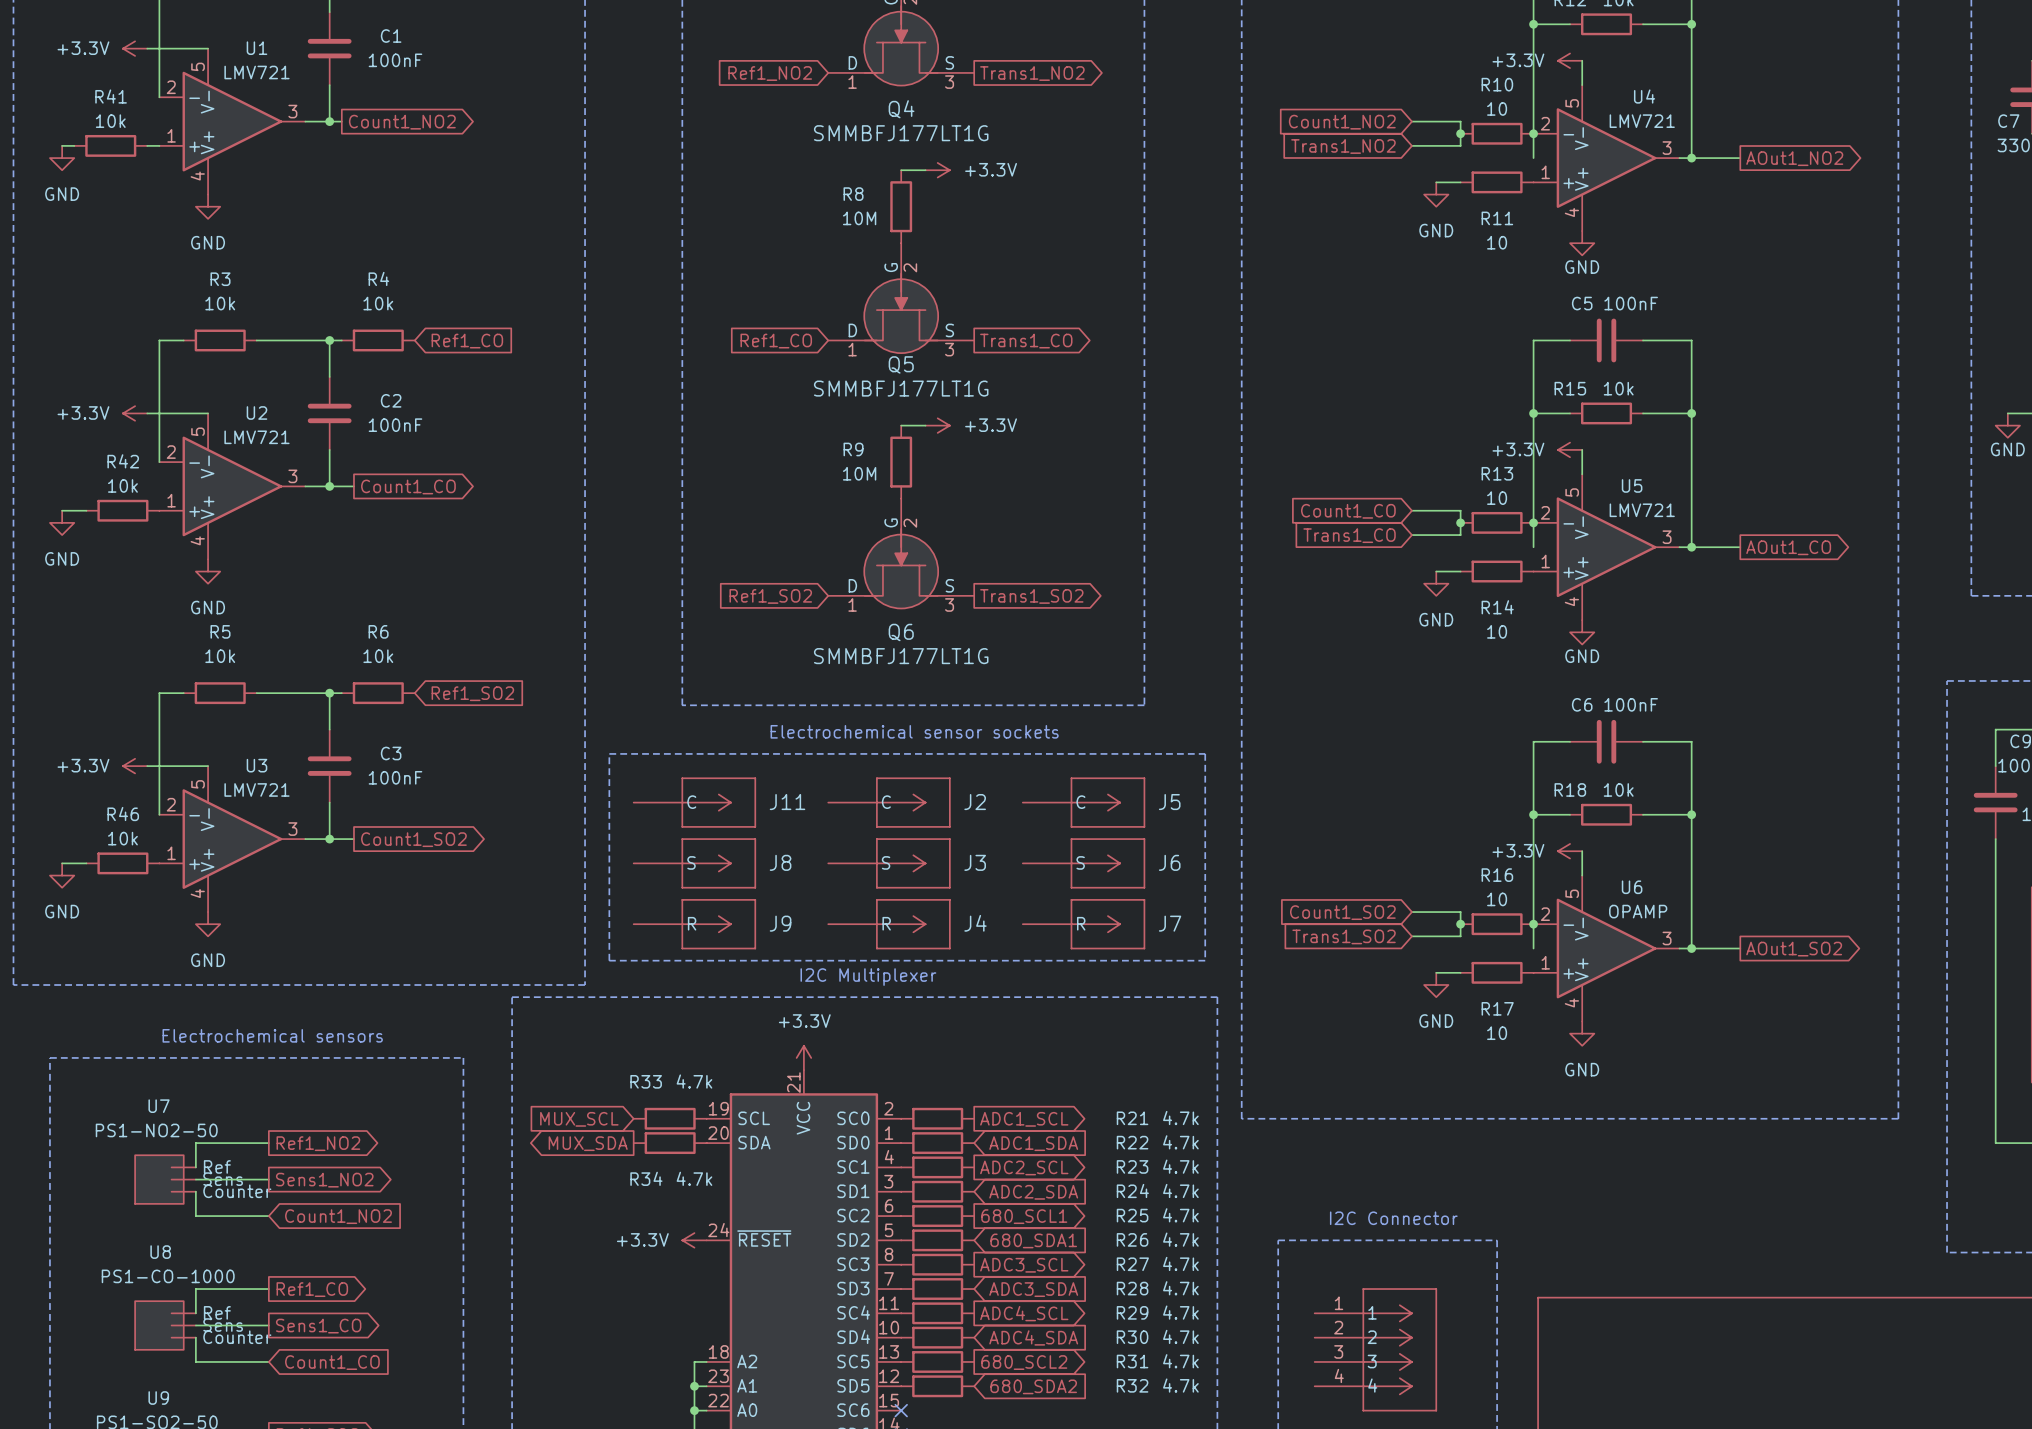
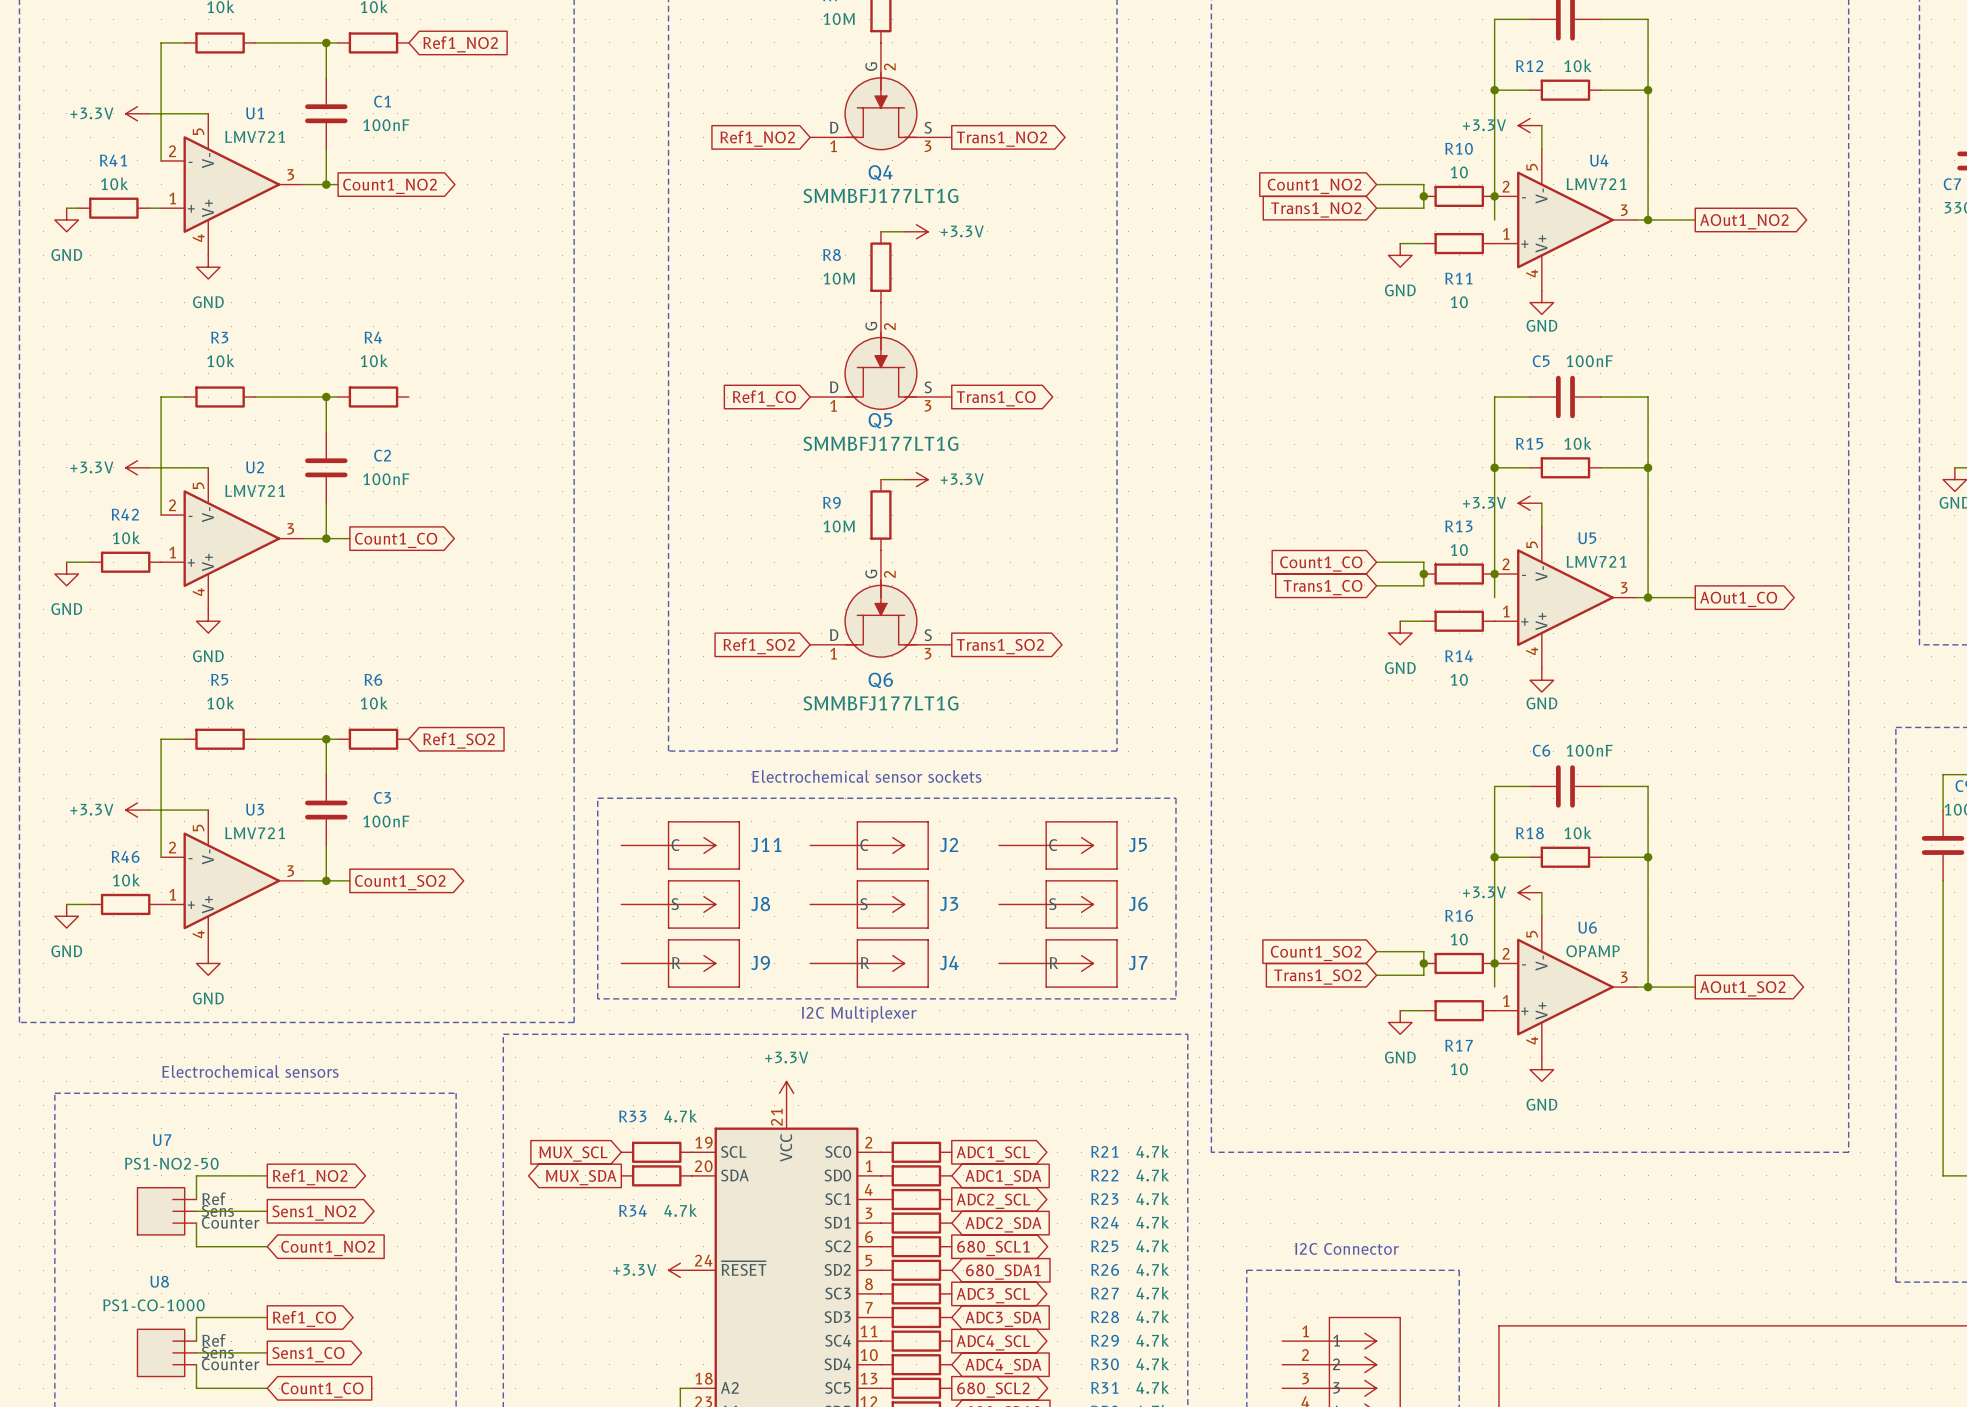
global label: Ref1_CO (467, 341) -> none

